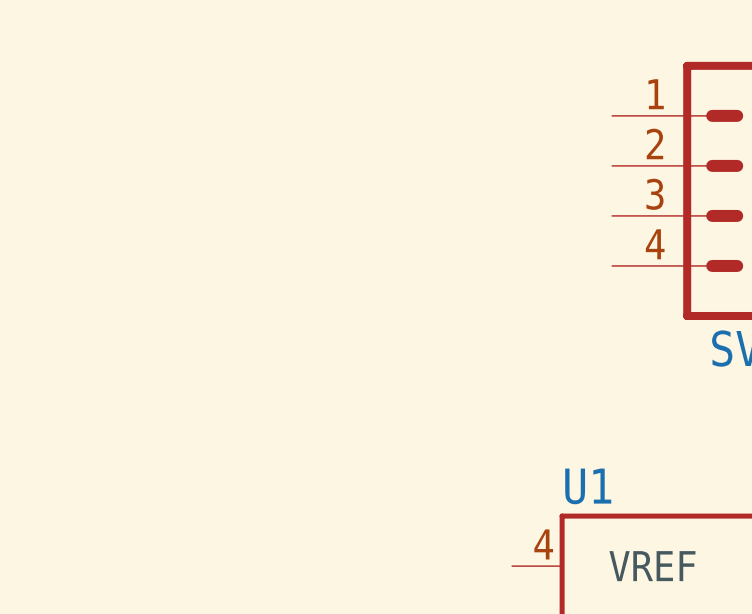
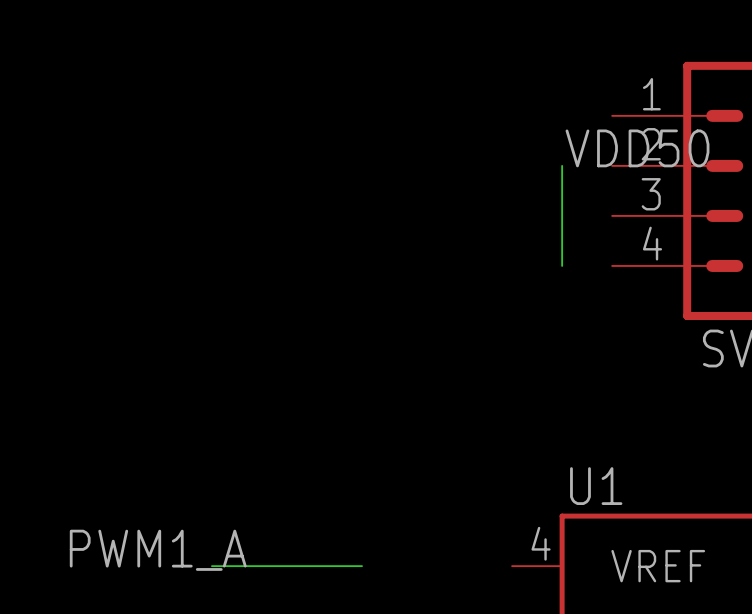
label: none -> VDD50 (637, 148)
wire: none -> (562, 165) (562, 265)
label: none -> PWM1_A (158, 550)
wire: none -> (211, 566) (362, 566)

